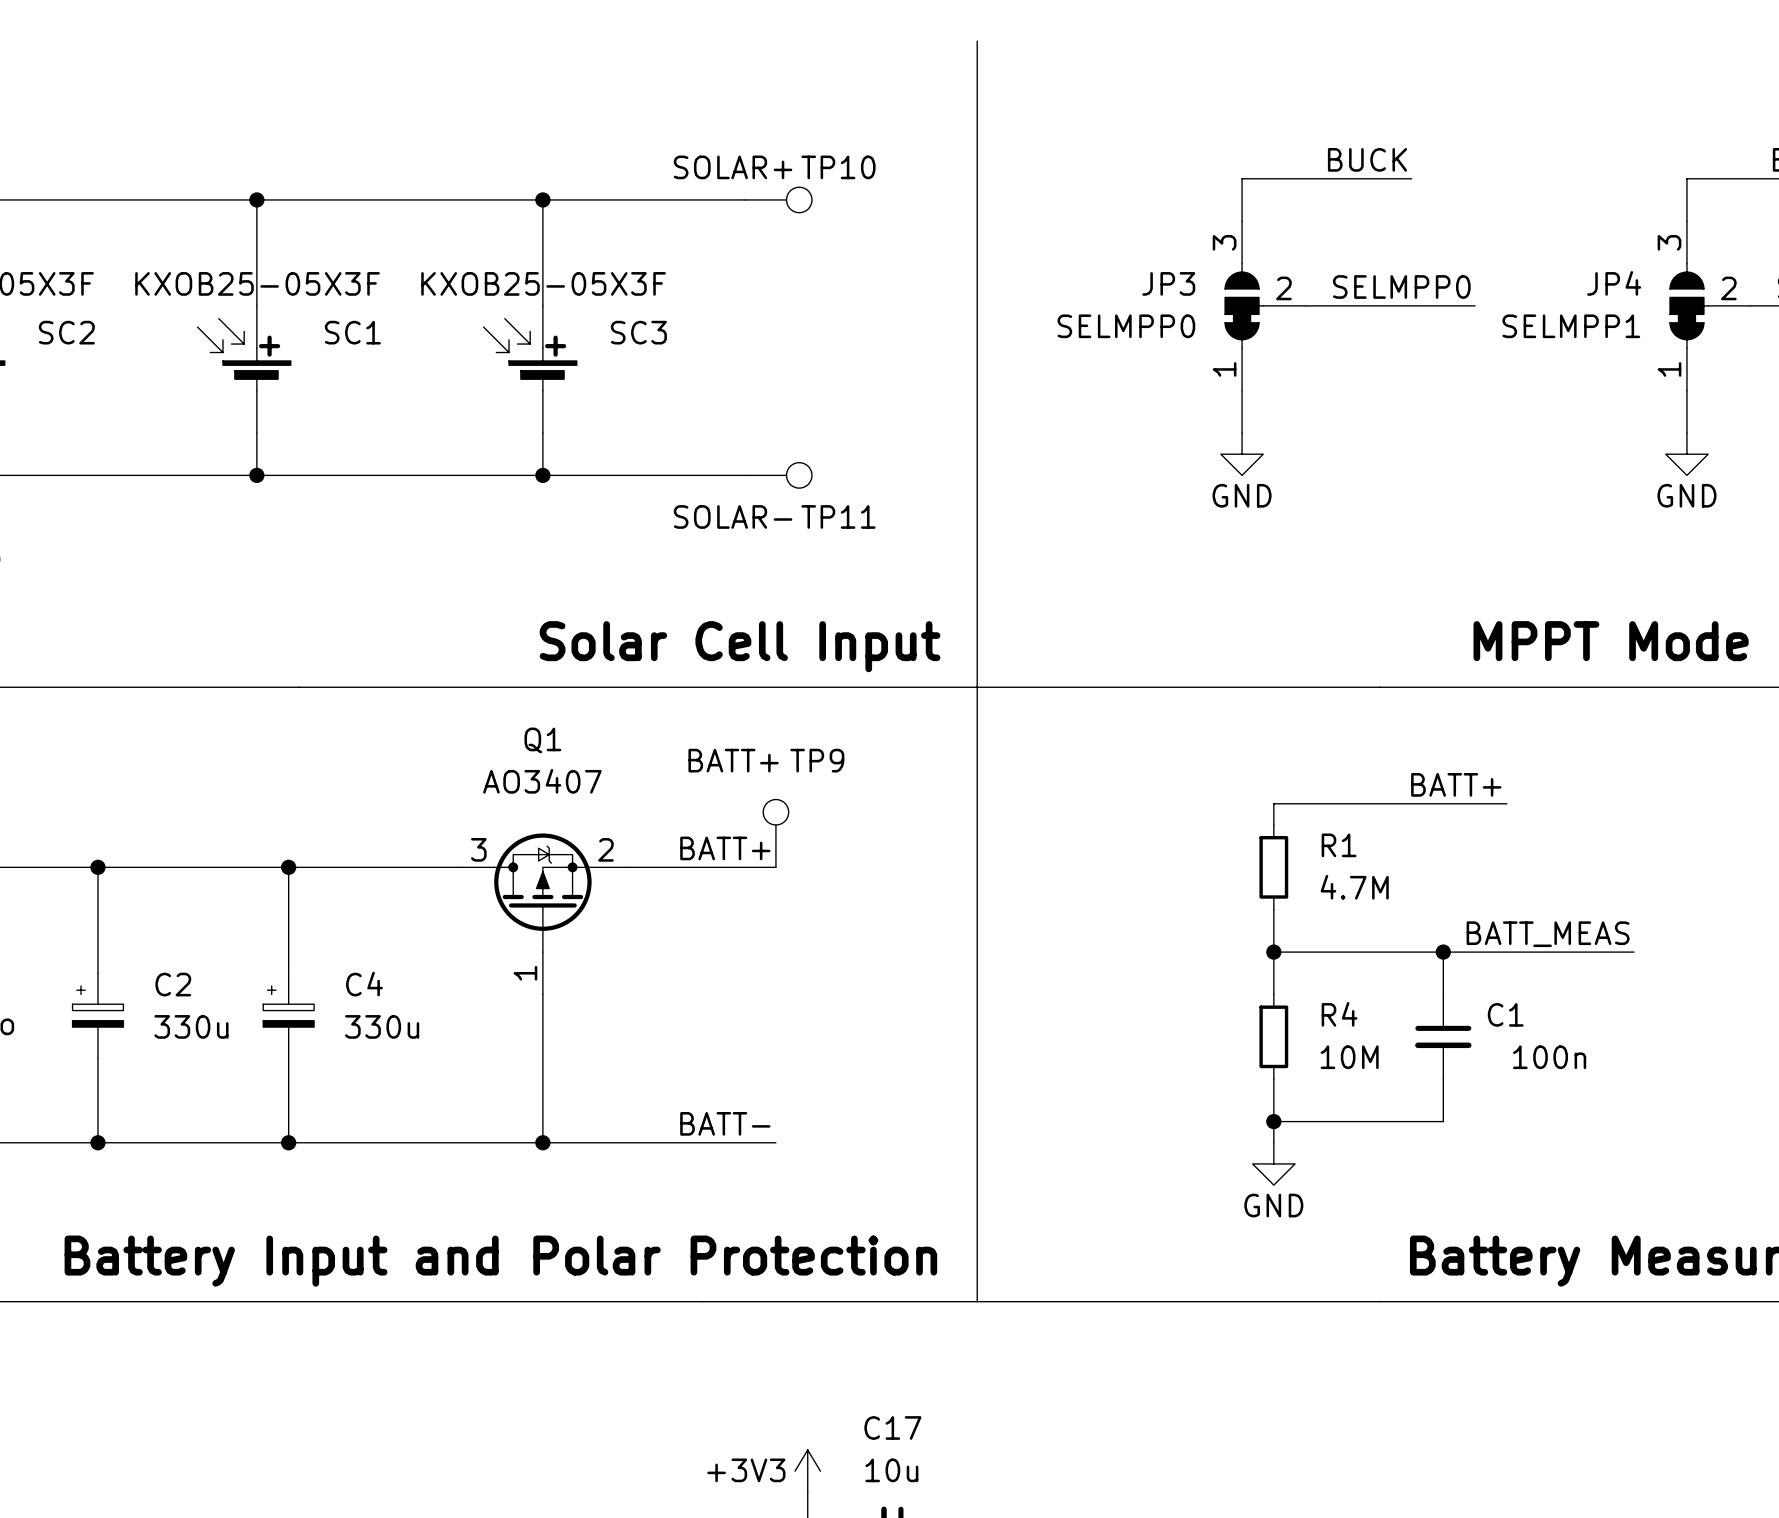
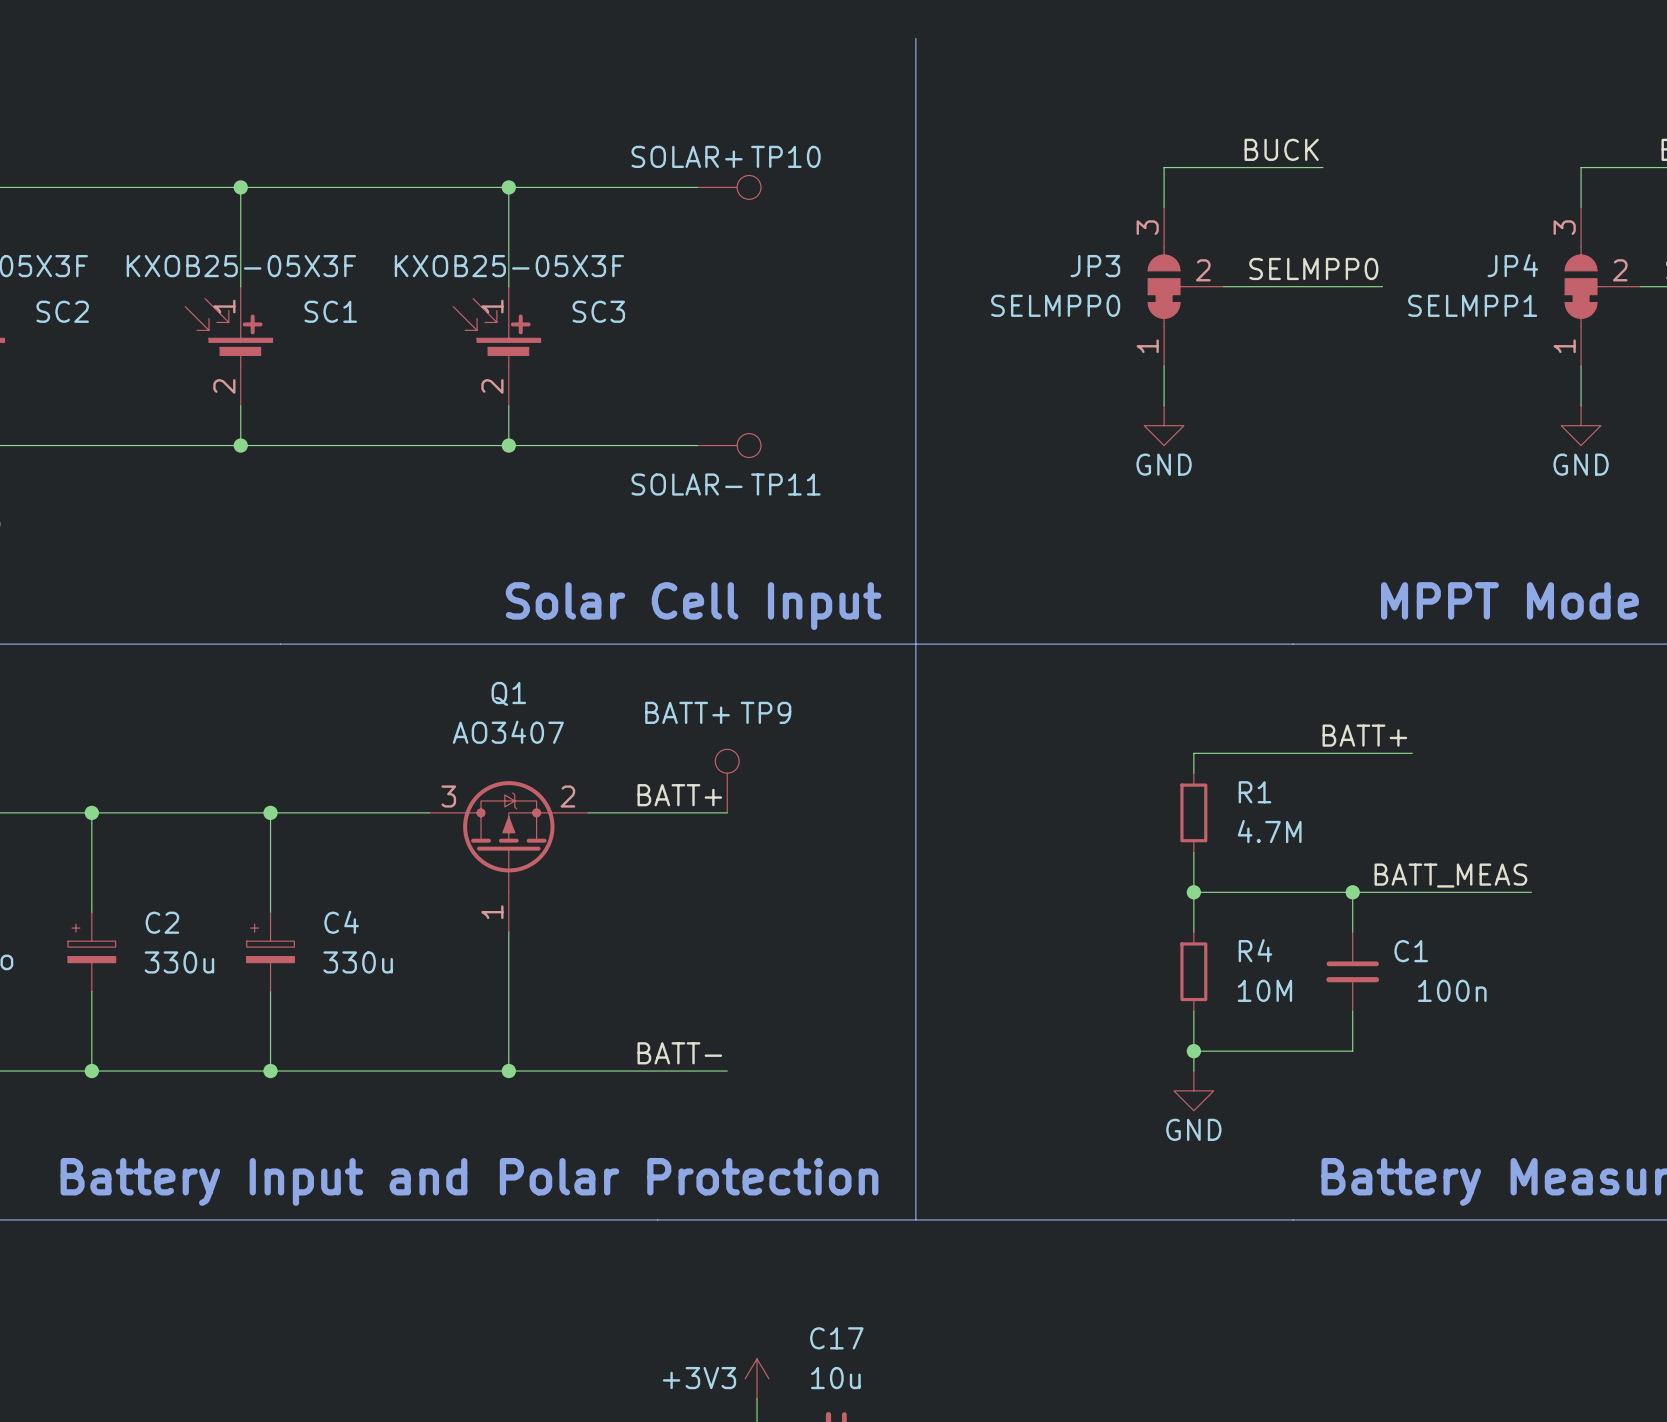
SC1 pin number: none -> 1 (224, 306)
SC3 pin number: none -> 1 (492, 306)
SC1 pin number: none -> 2 (224, 386)
SC3 pin number: none -> 2 (492, 386)

